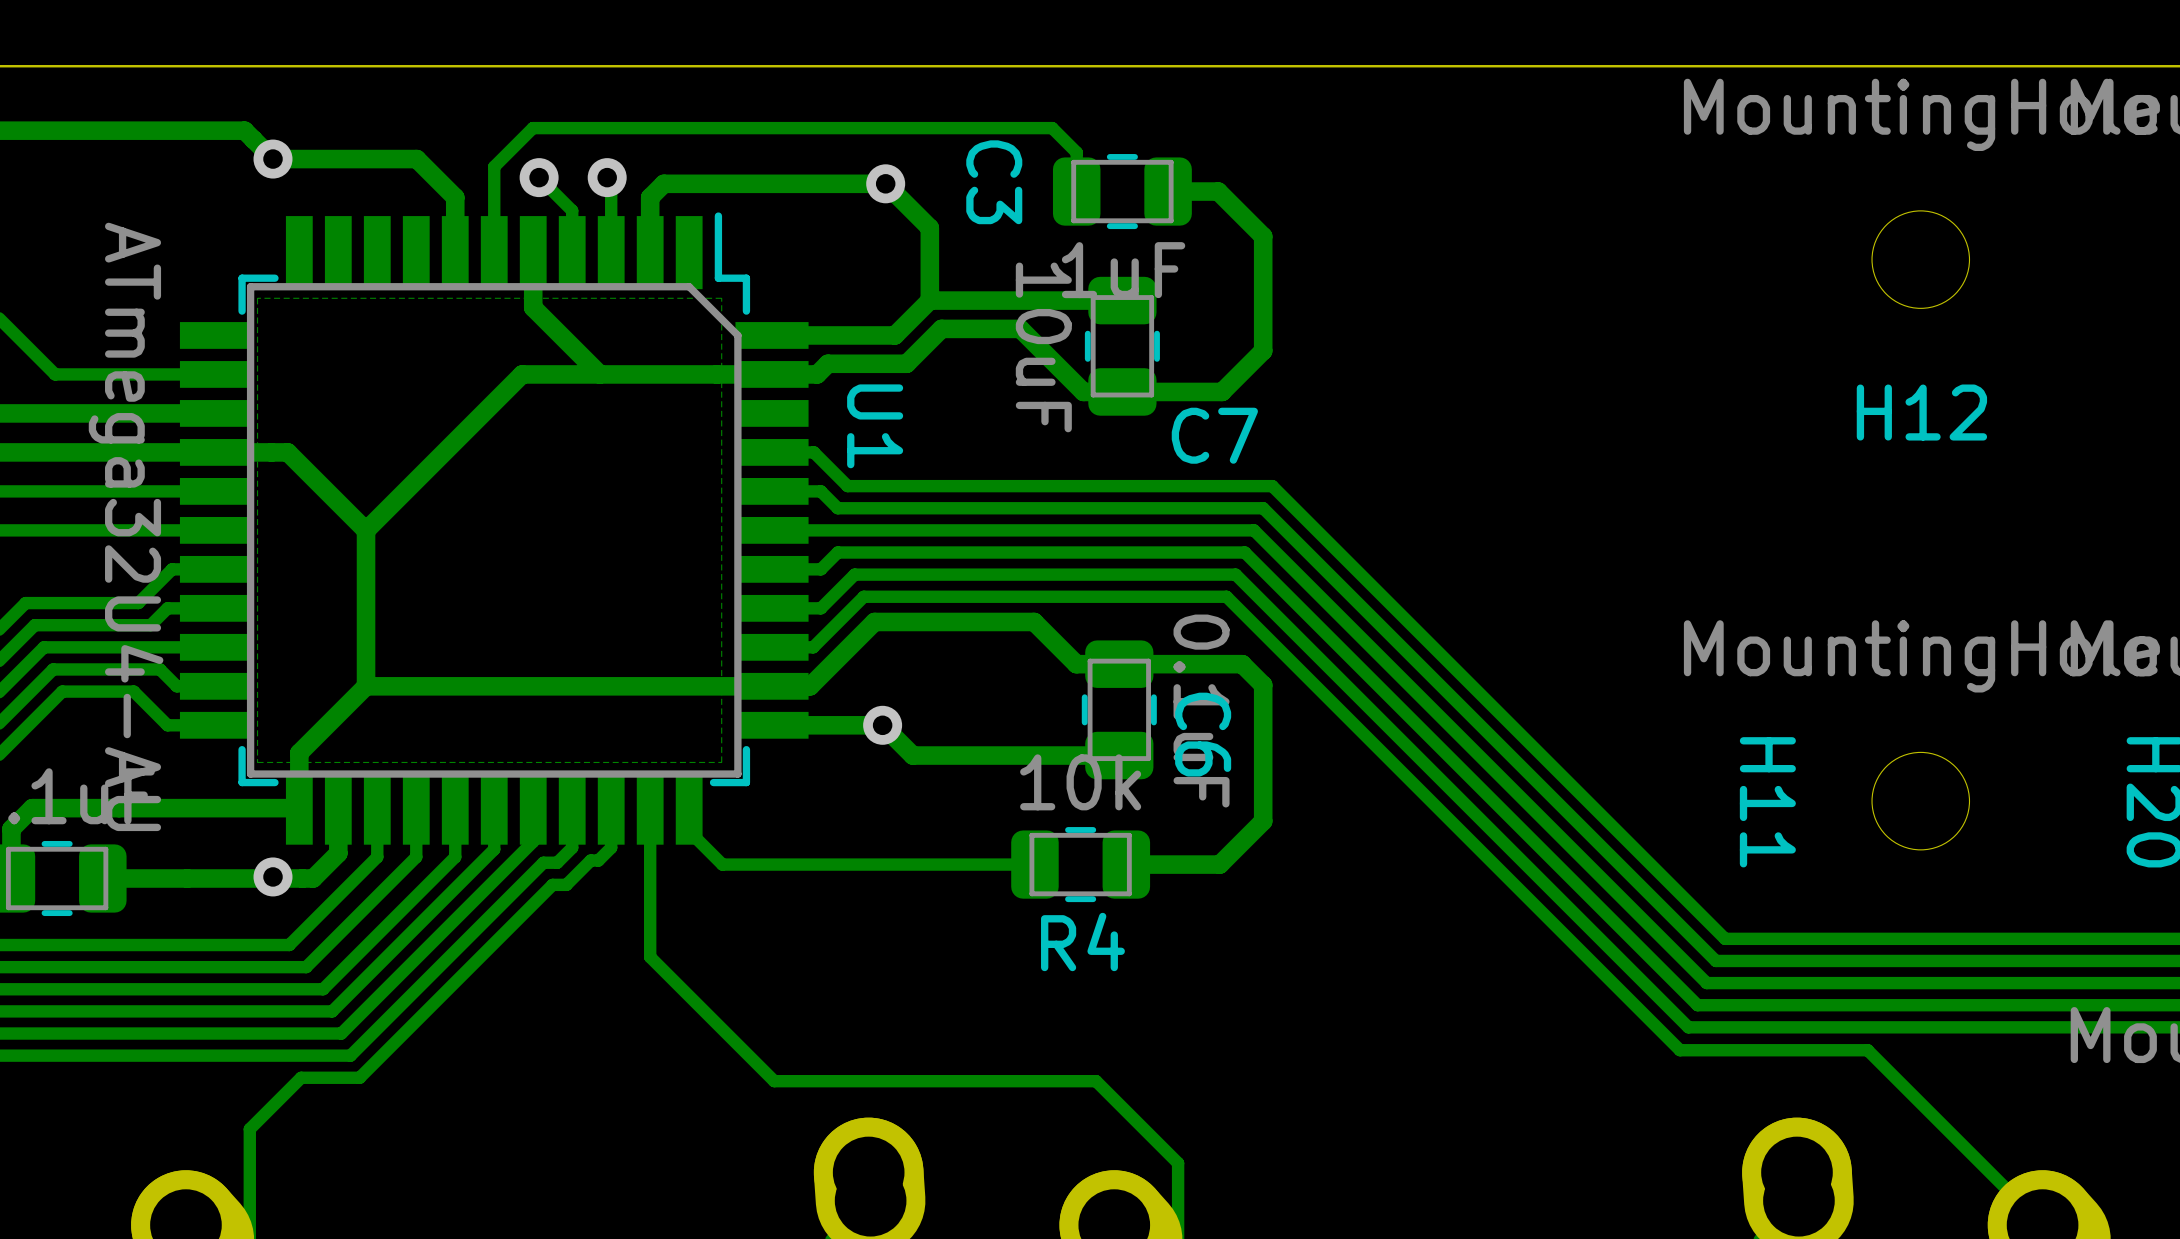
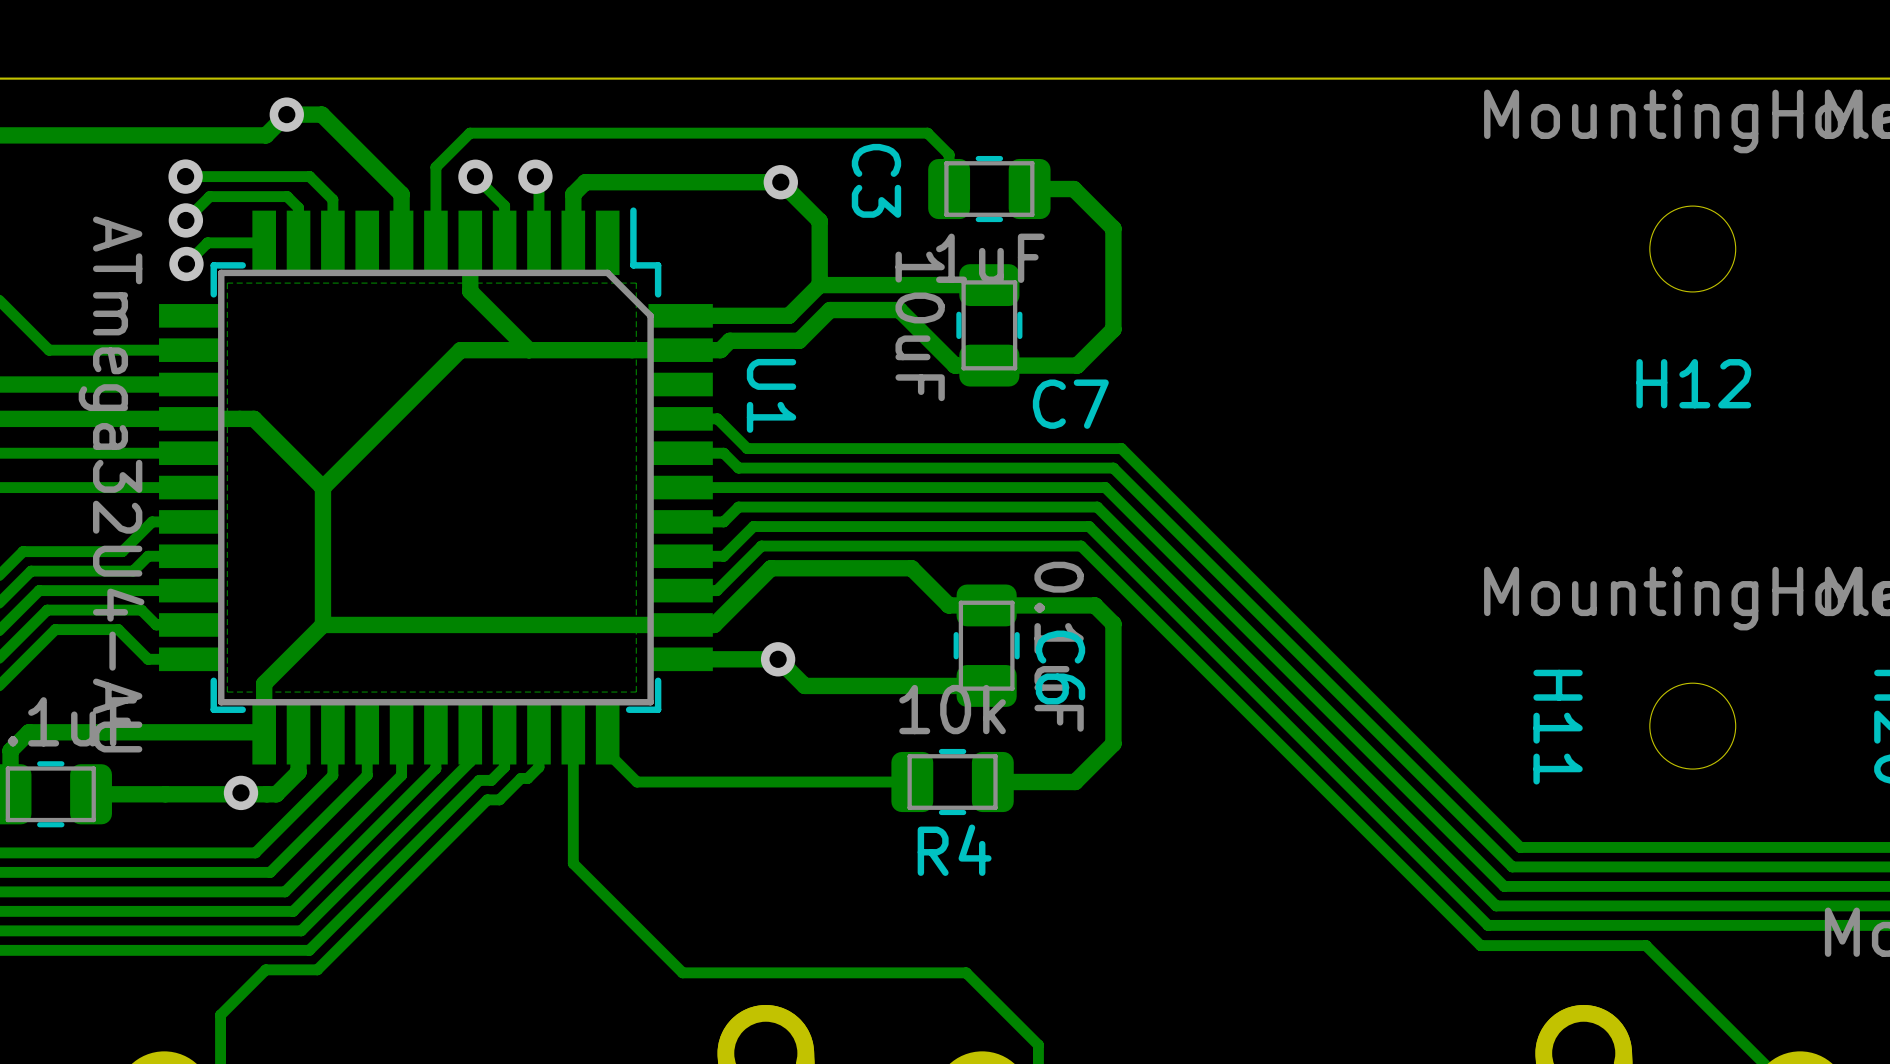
via: none -> (286, 114)
track: (244, 130) (273, 159) (416, 159) -> (215, 135) (266, 135) (286, 114) (321, 114) (367, 160)
via: (273, 159) -> none
track: none -> (185, 176) (309, 176) (332, 199) (332, 242)
via: none -> (185, 176)
track: none -> (185, 220) (209, 196) (287, 196) (298, 207) (298, 242)
via: none -> (185, 220)
track: none -> (264, 242) (207, 242) (186, 264)
via: none -> (186, 264)

